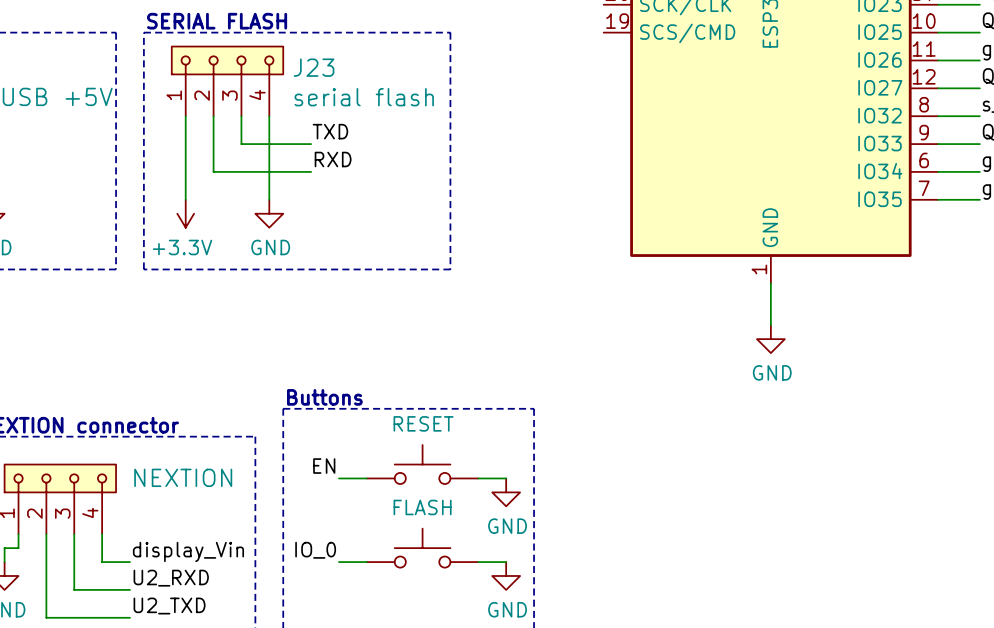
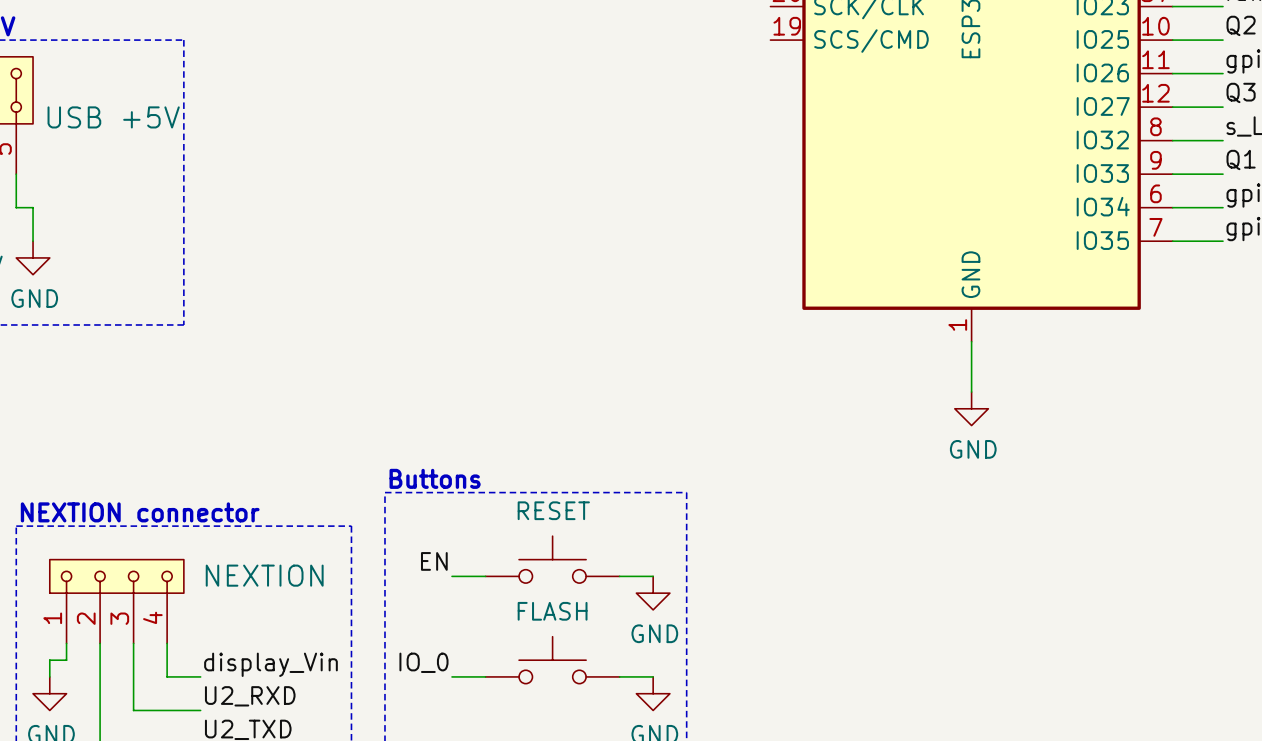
text: SERIAL FLASH (217, 21) -> none
line: (143, 32) (450, 32) (450, 269) (143, 269) (143, 32) -> none
J23: serial flash (227, 81) -> none
wire: (185, 116) (185, 199) -> none
wire: (213, 116) (213, 171) (311, 171) -> none
wire: (241, 116) (241, 144) (311, 144) -> none
wire: (269, 116) (269, 199) -> none
label: TXD (330, 131) -> none
label: RXD (333, 159) -> none
power symbol: +3.3V (185, 213) -> none
power symbol: GND (269, 213) -> none

